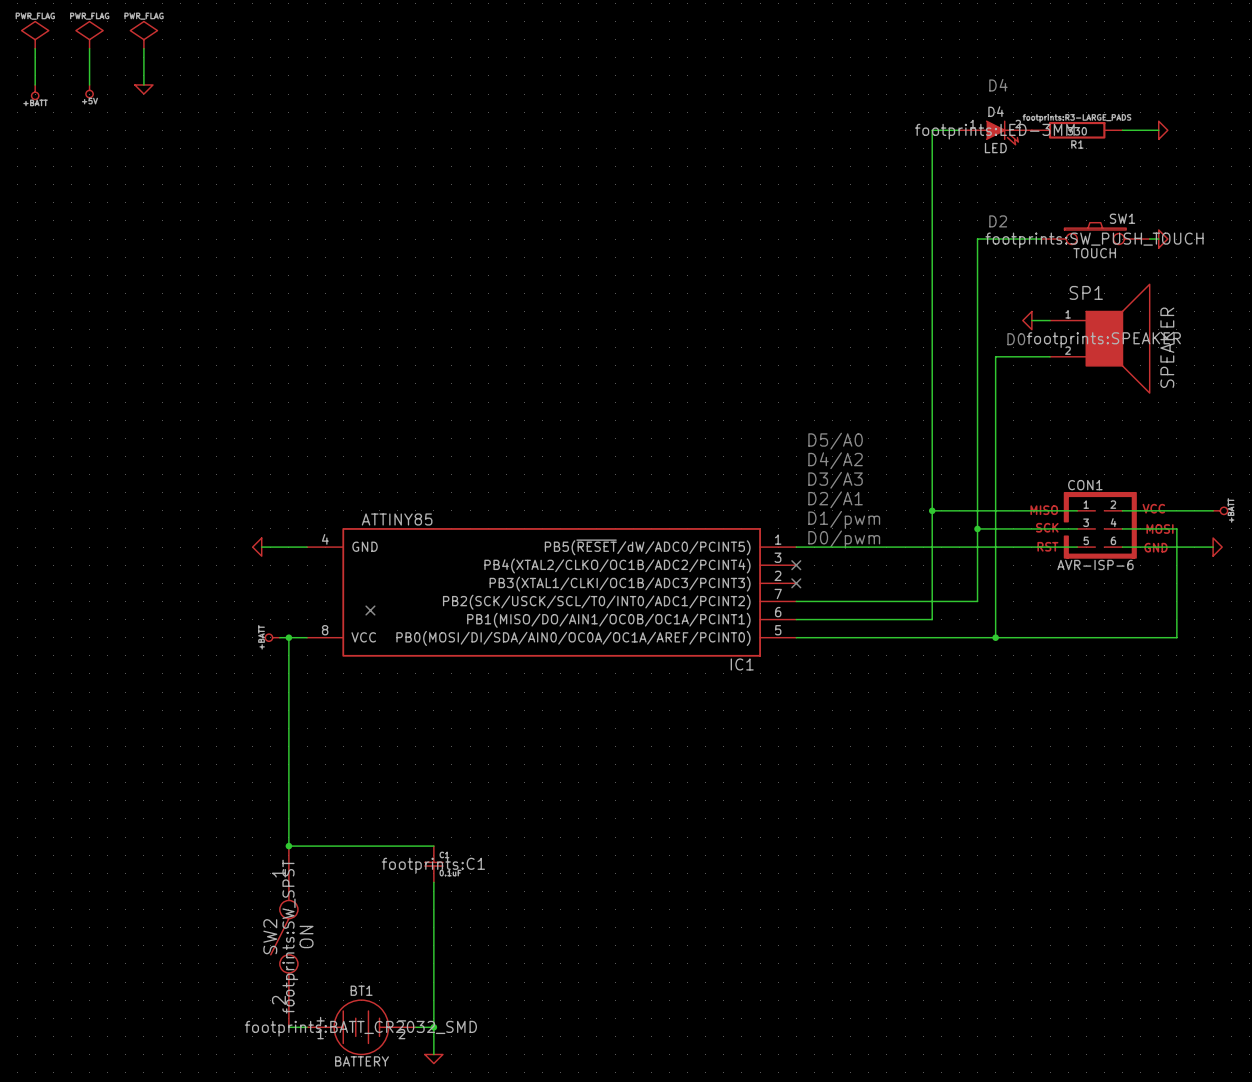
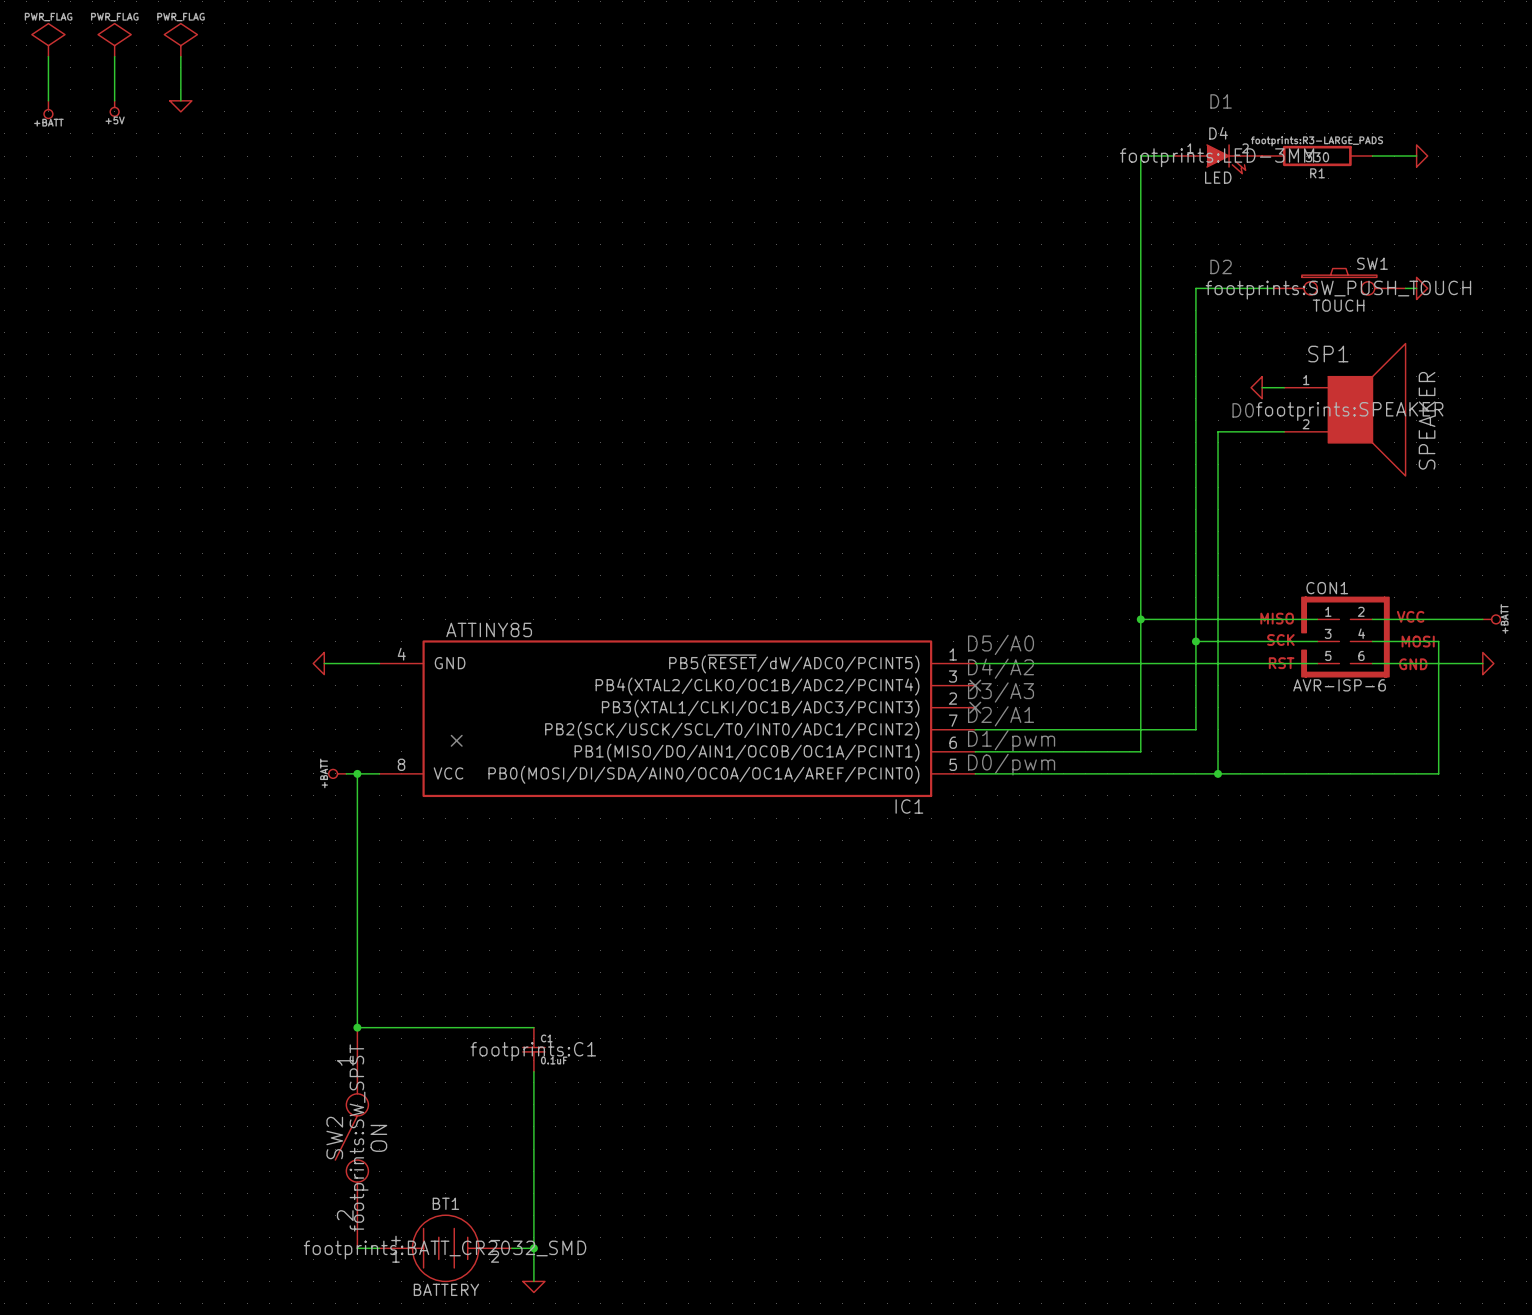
text: D4 (998, 85) -> D1 (1221, 101)
text position: D5/A0 (835, 441) -> D5/A0 (1001, 644)
text position: D4/A2 (835, 460) -> D4/A2 (1001, 668)
text position: D3/A3 (835, 480) -> D3/A3 (1001, 692)
text position: D2/A1 (835, 499) -> D2/A1 (1001, 716)
text position: D1/pwm (844, 519) -> D1/pwm (1011, 740)
text position: D0/pwm (844, 539) -> D0/pwm (1011, 764)

